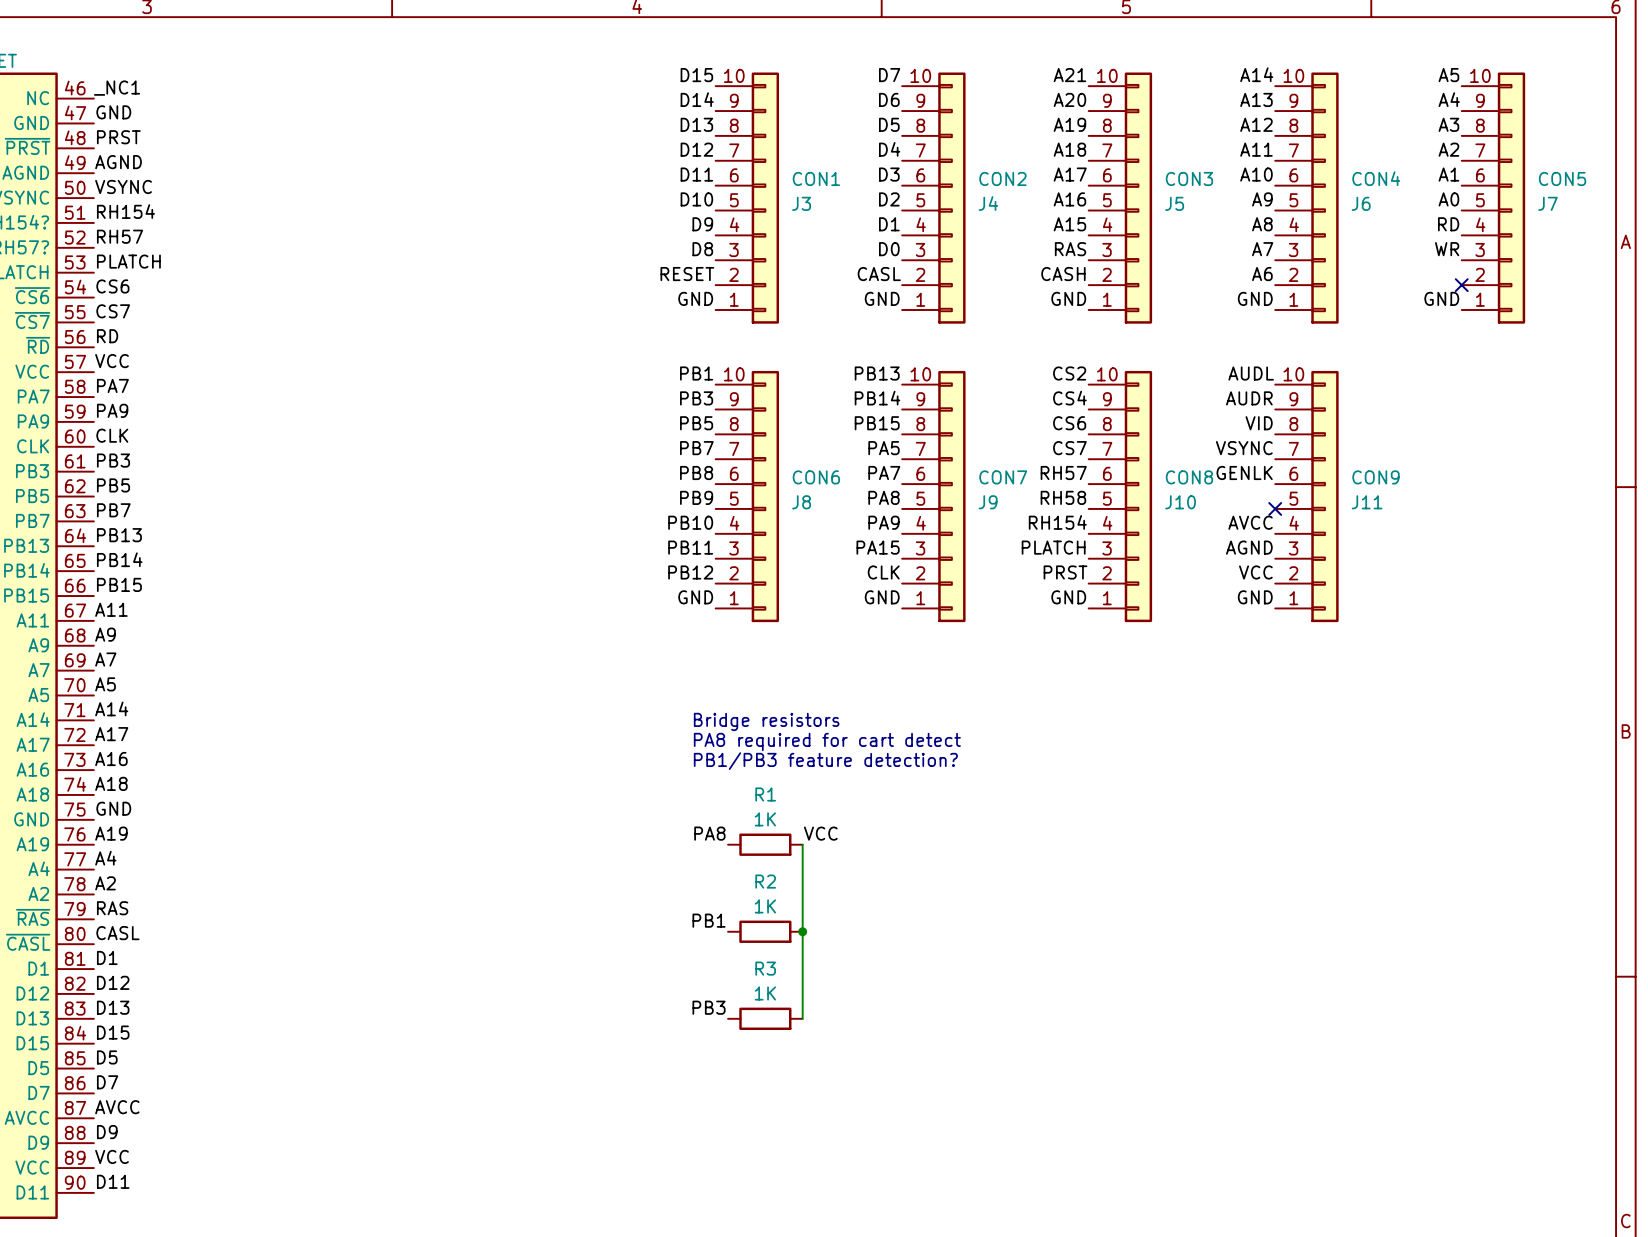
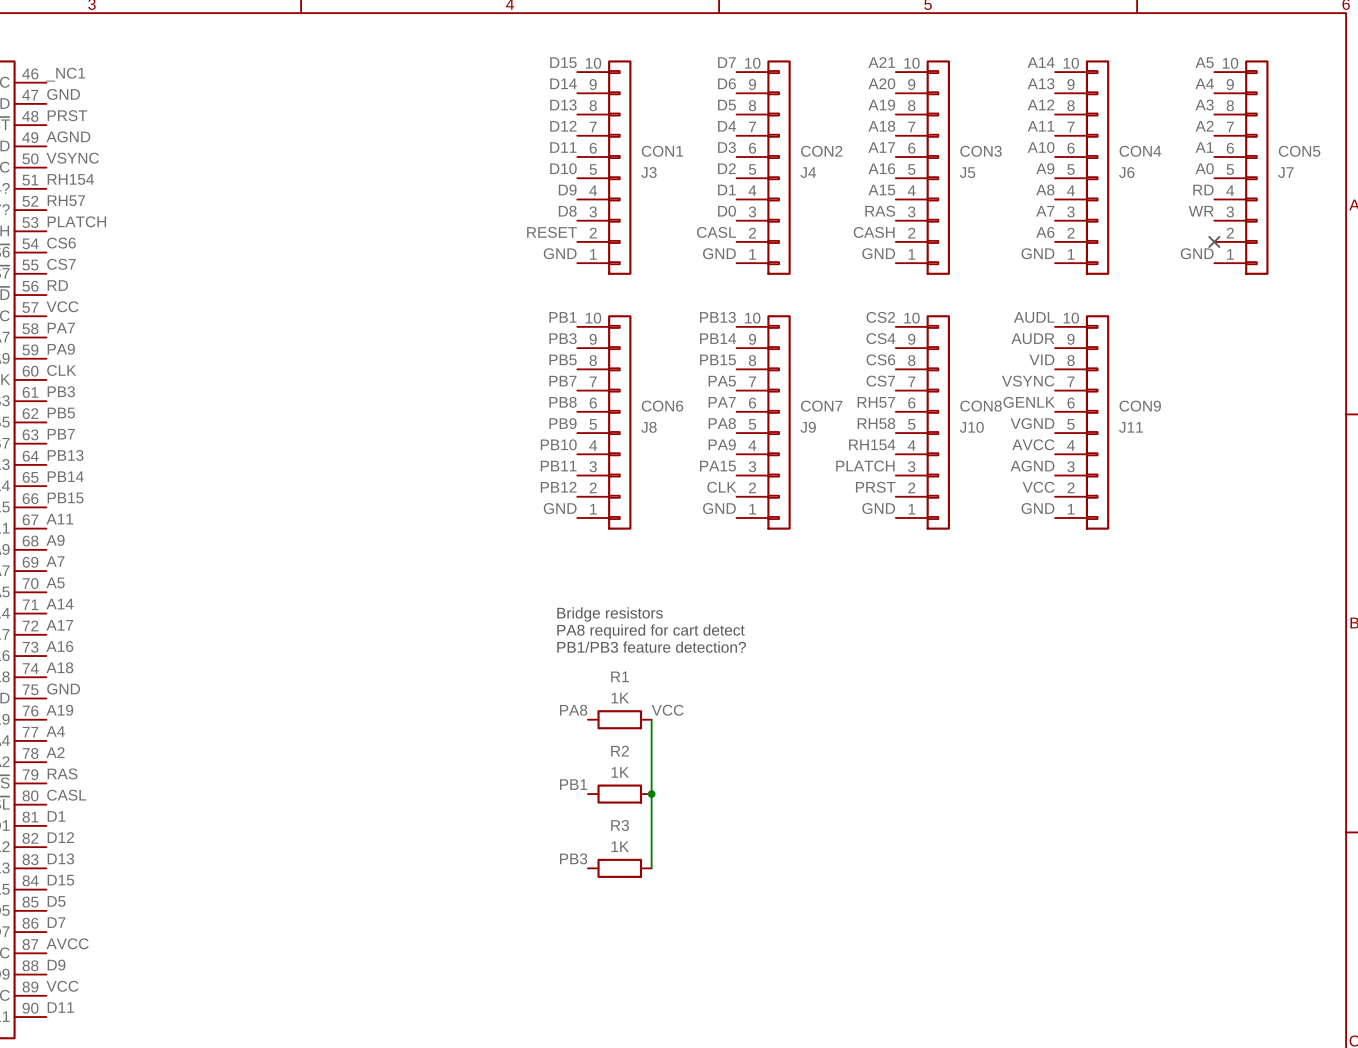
label: none -> VGND (1032, 423)
no-connect mark: (1275, 508) -> none

